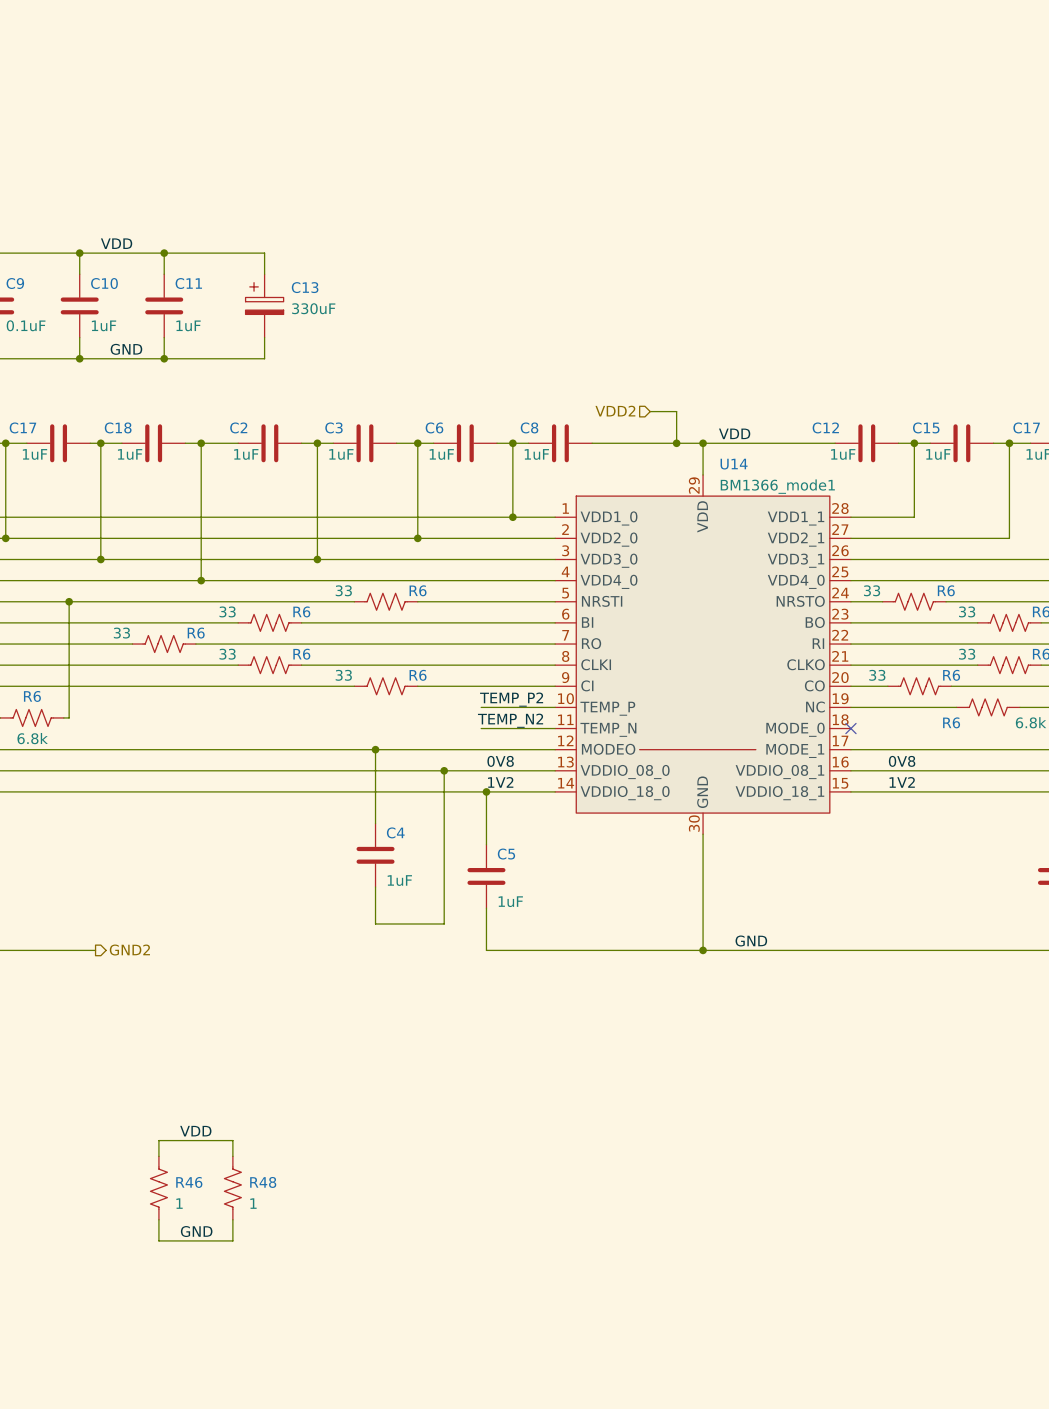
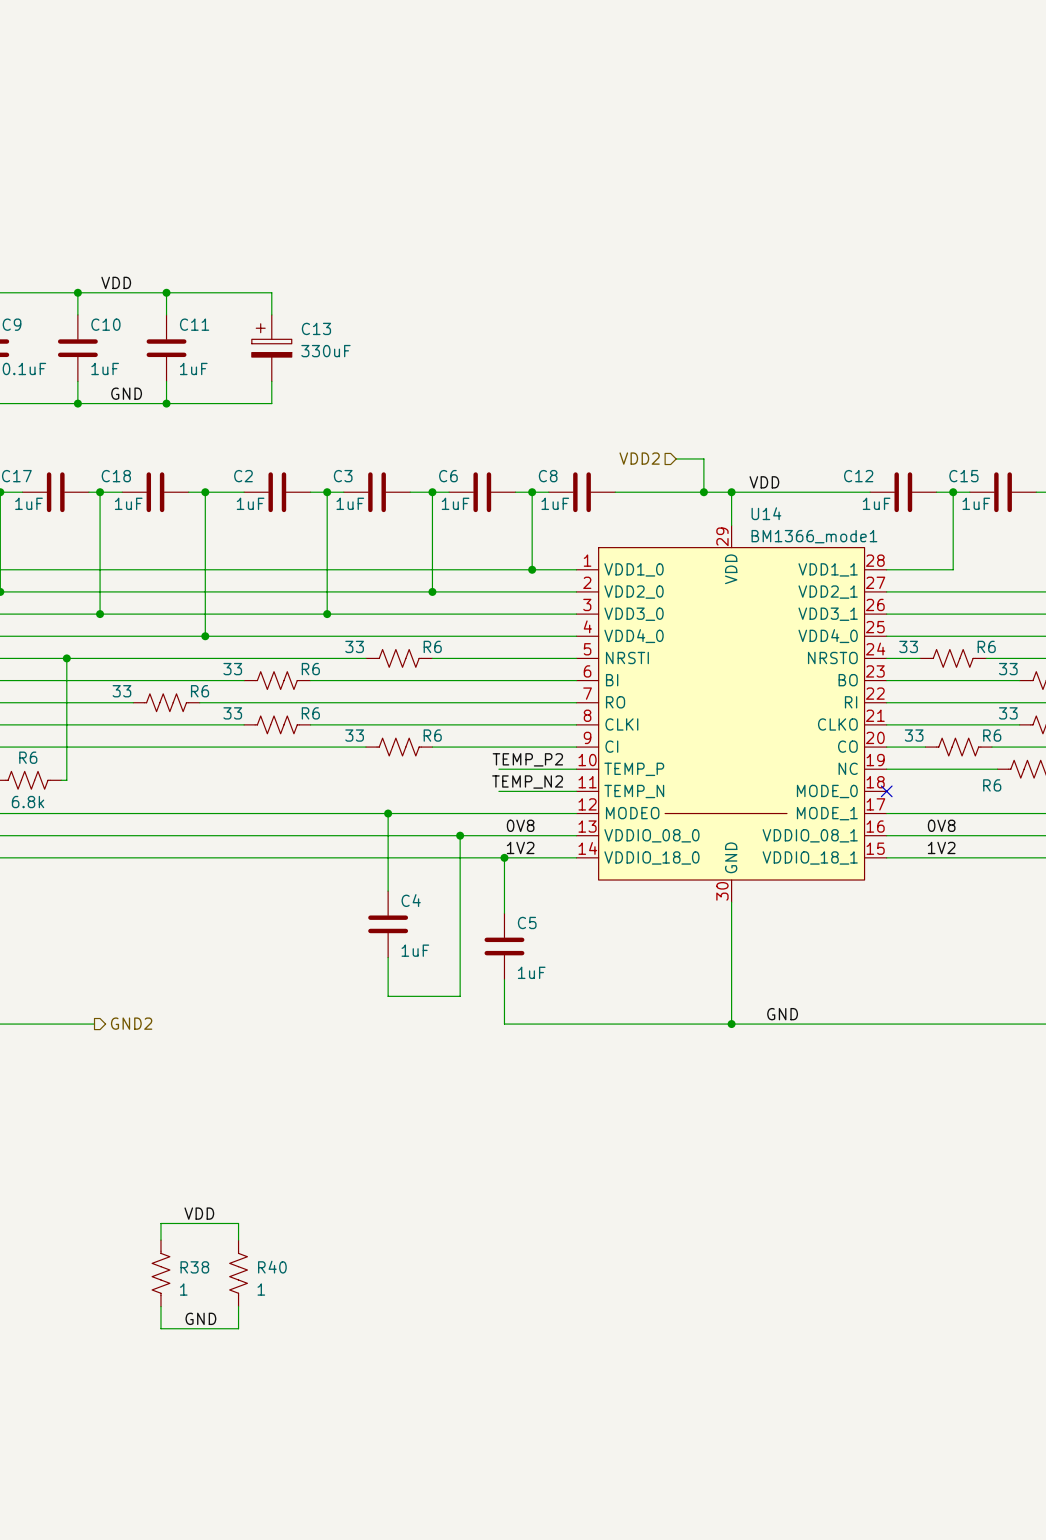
R46 name: R46 (189, 1182) -> R38 (194, 1267)
R48 name: R48 (263, 1182) -> R40 (272, 1267)

